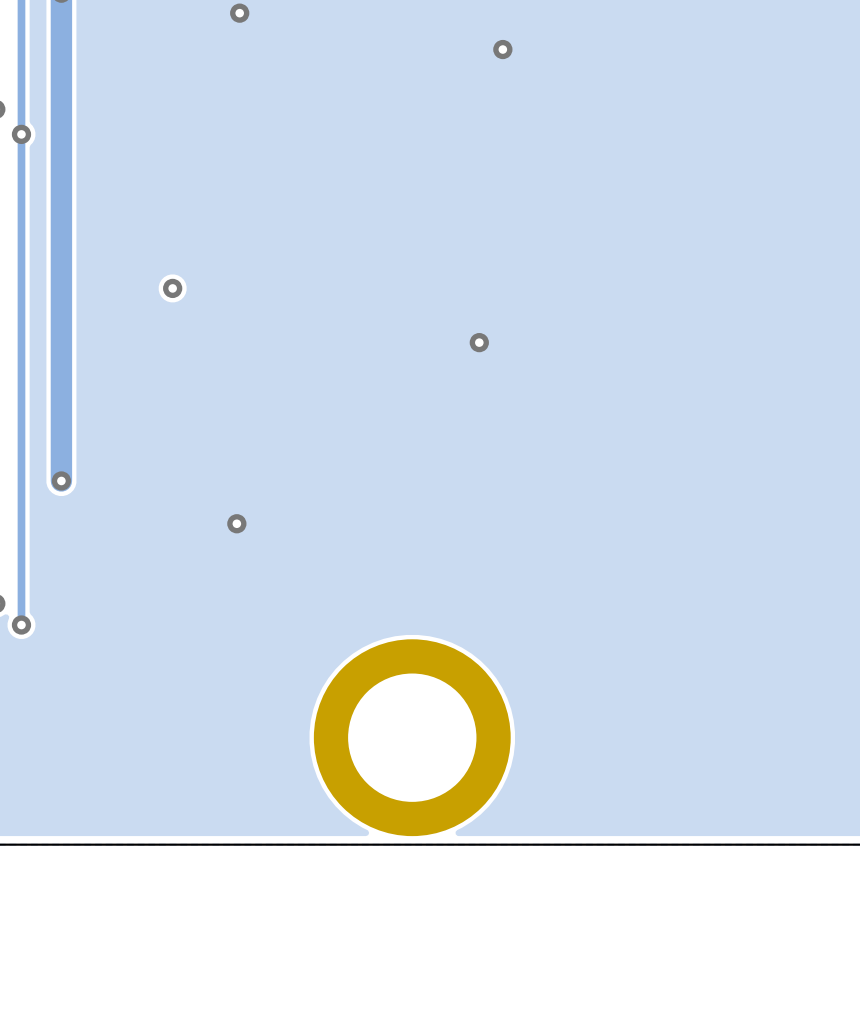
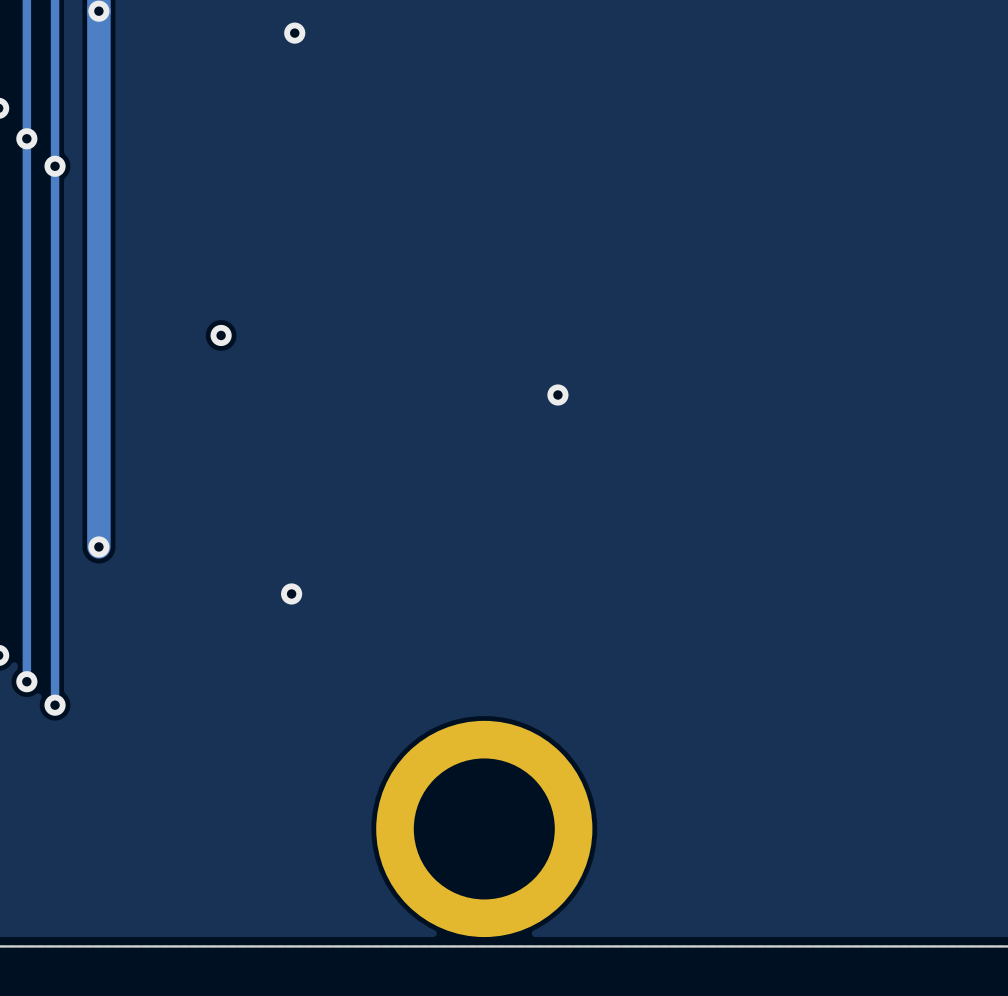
via: (502, 49) -> none

